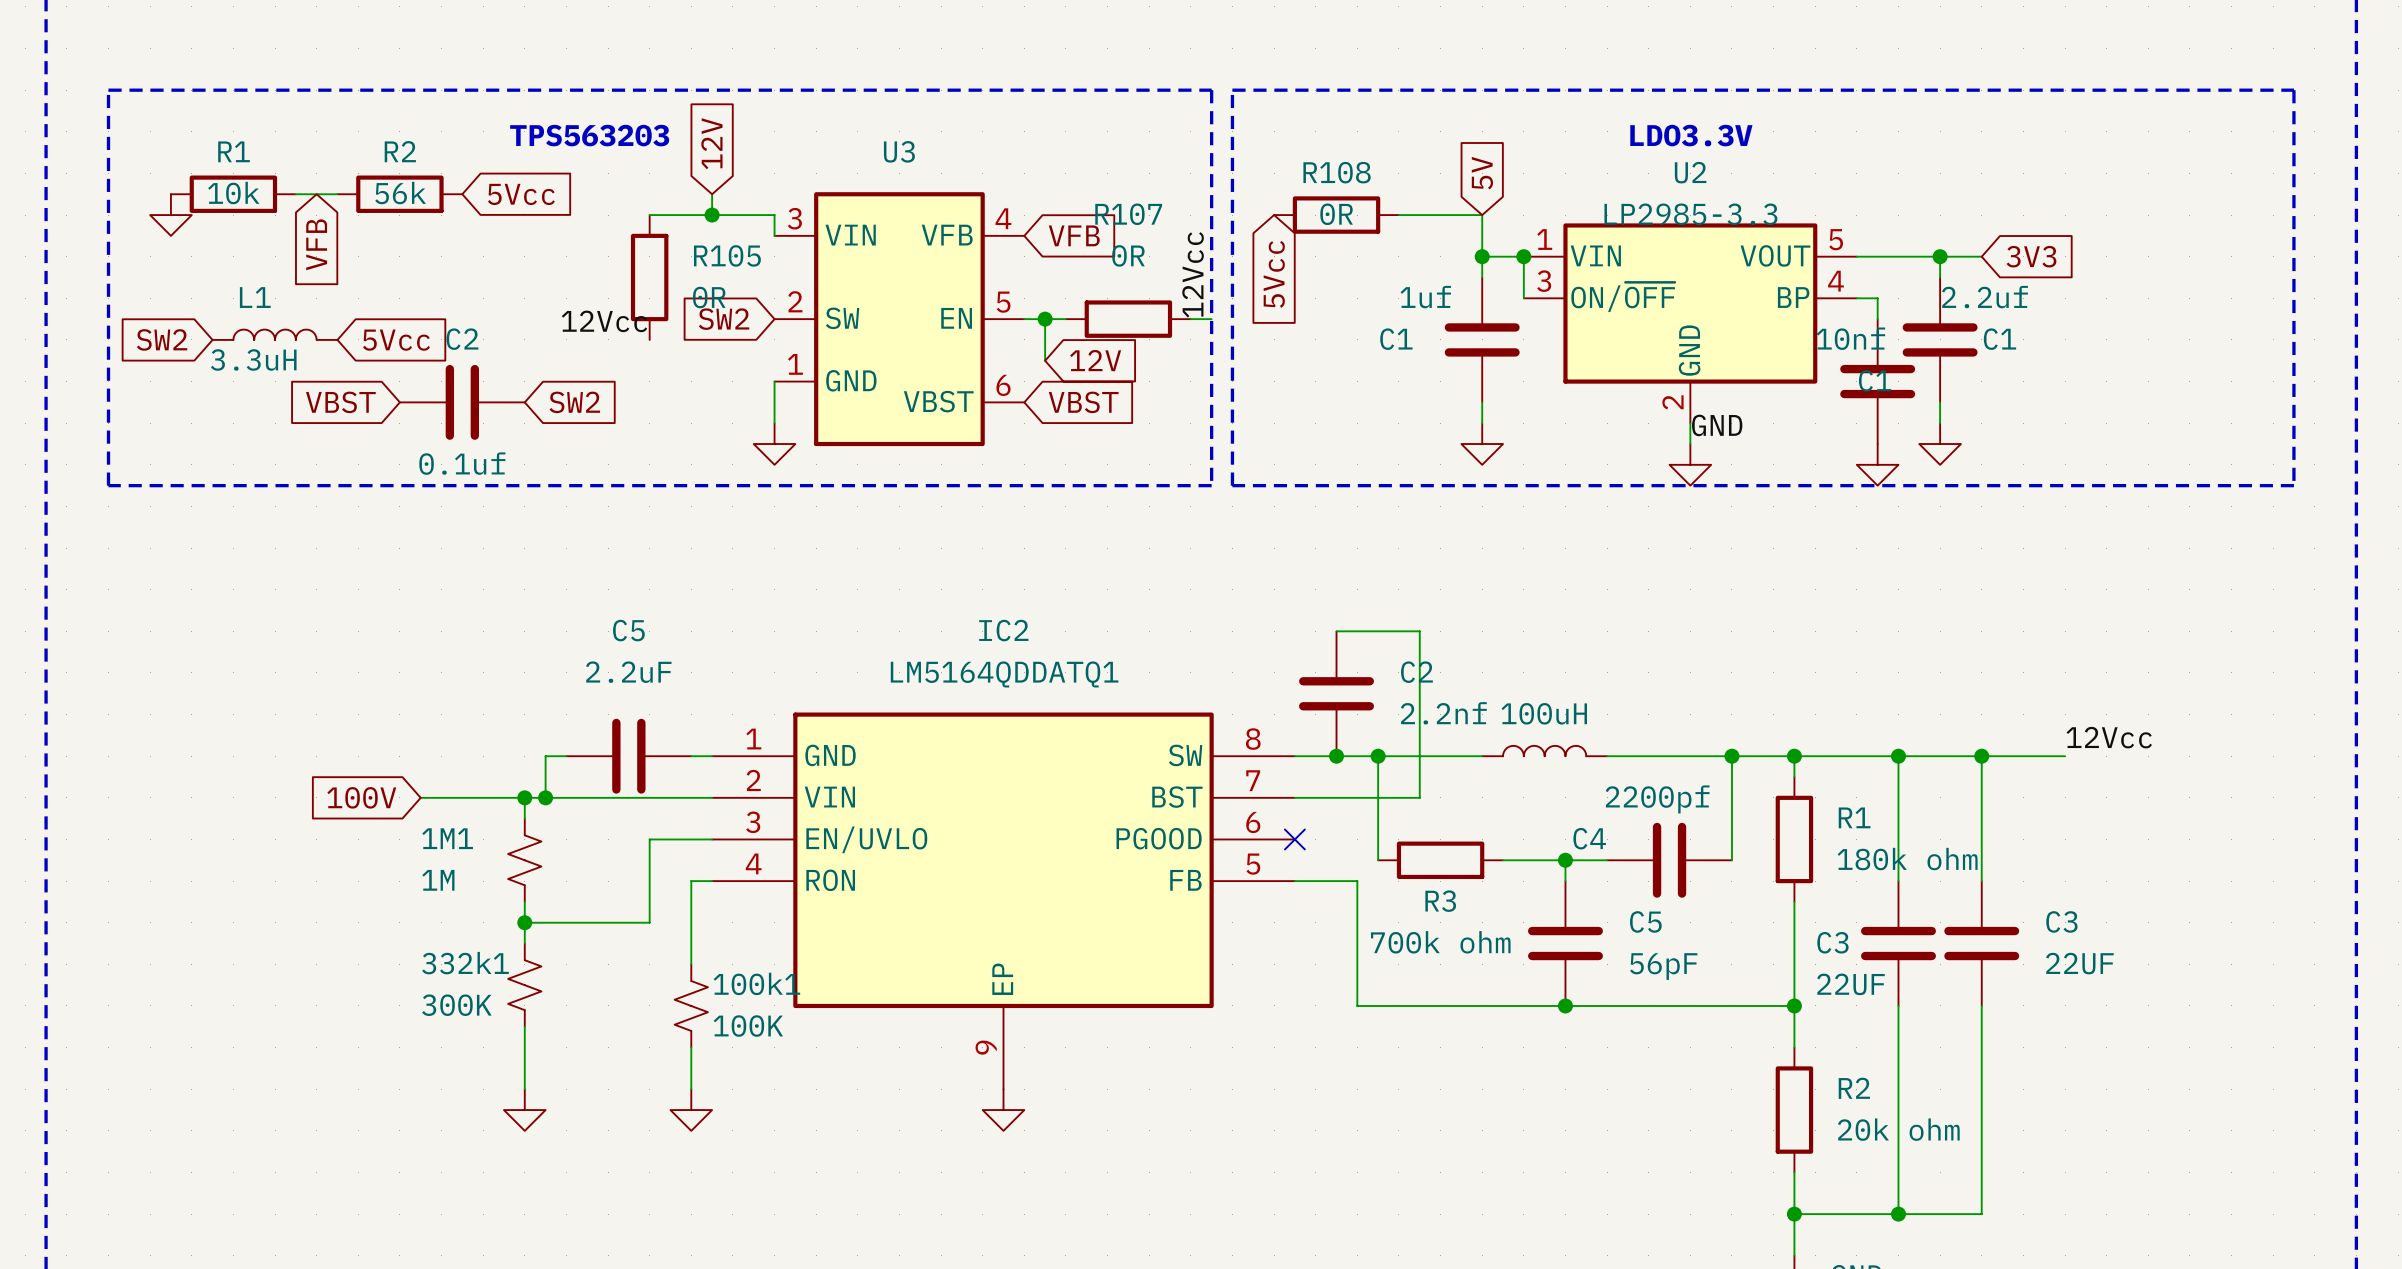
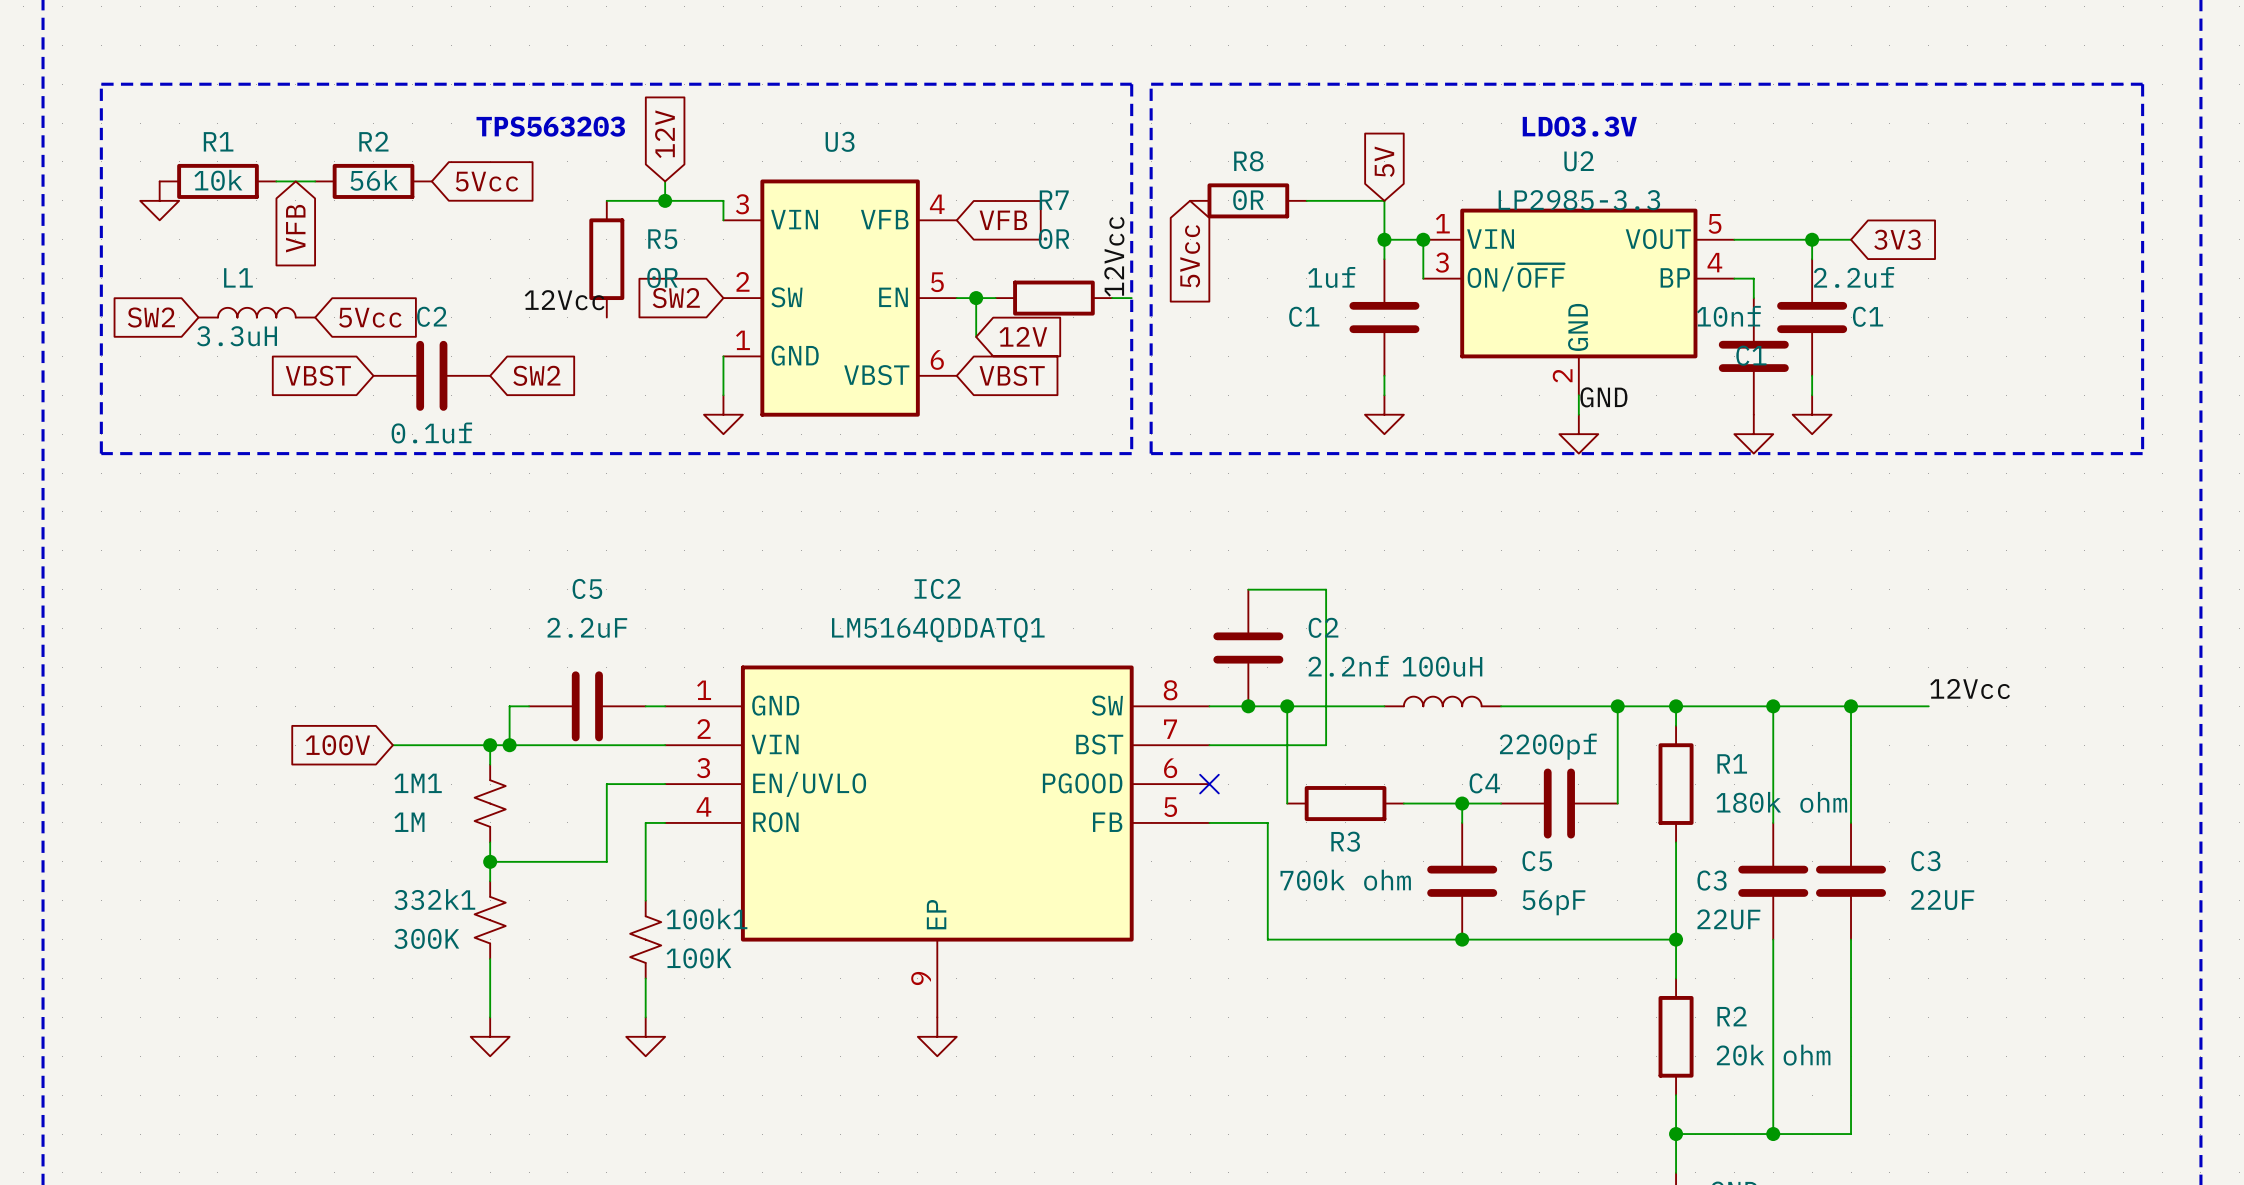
R108 name: R108 (1337, 172) -> R8 (1248, 161)
R107 name: R107 (1128, 214) -> R7 (1054, 200)
R105 name: R105 (727, 255) -> R5 (662, 239)

